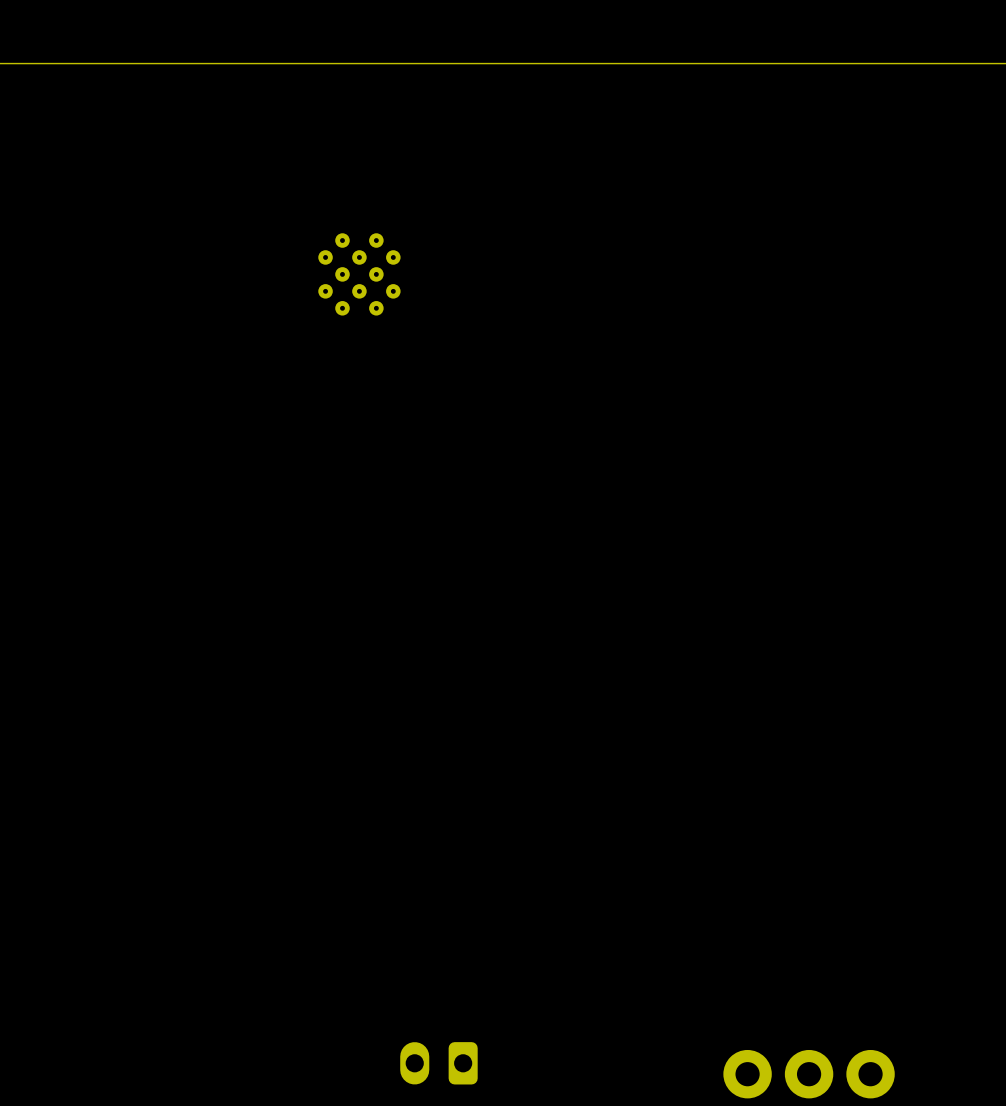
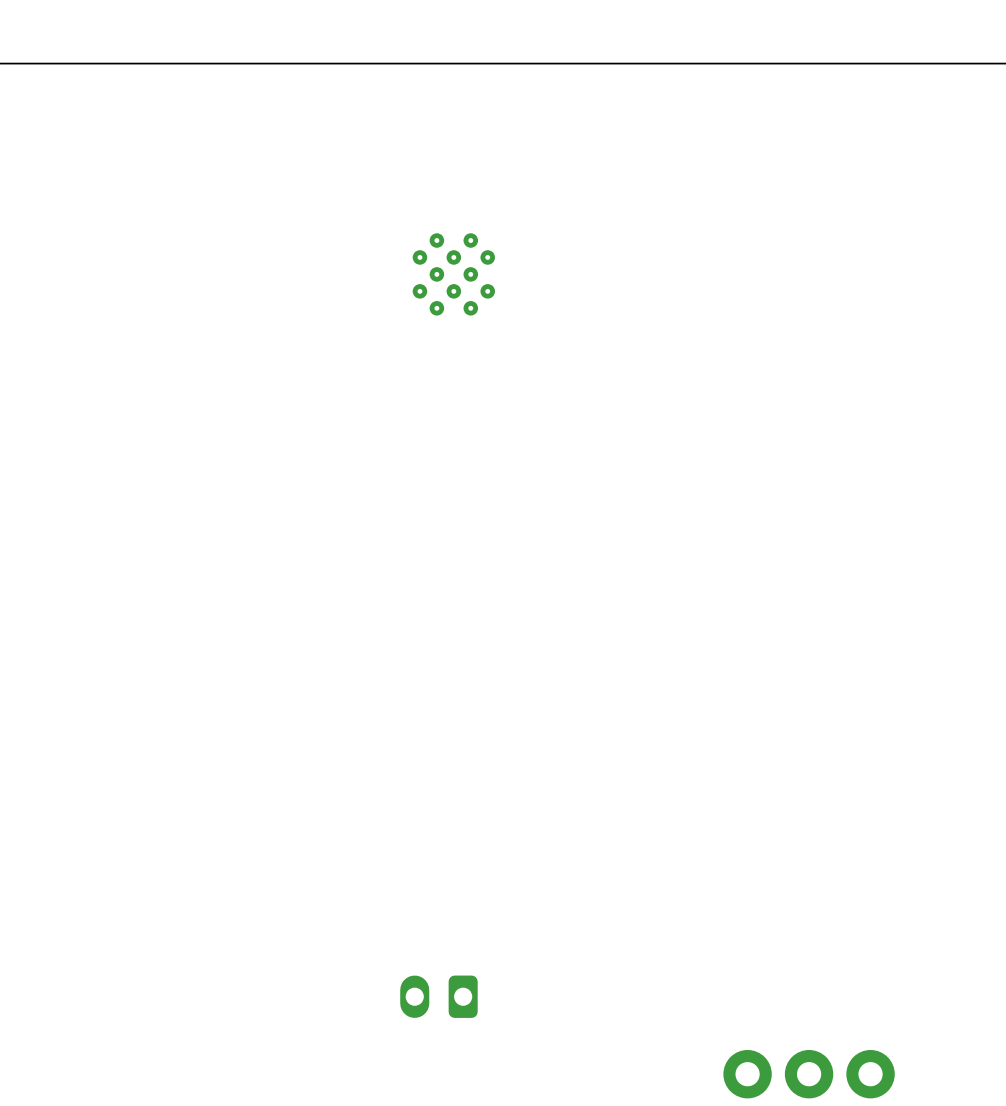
part position: (359, 274) -> (453, 274)
part position: (438, 1063) -> (438, 996)

